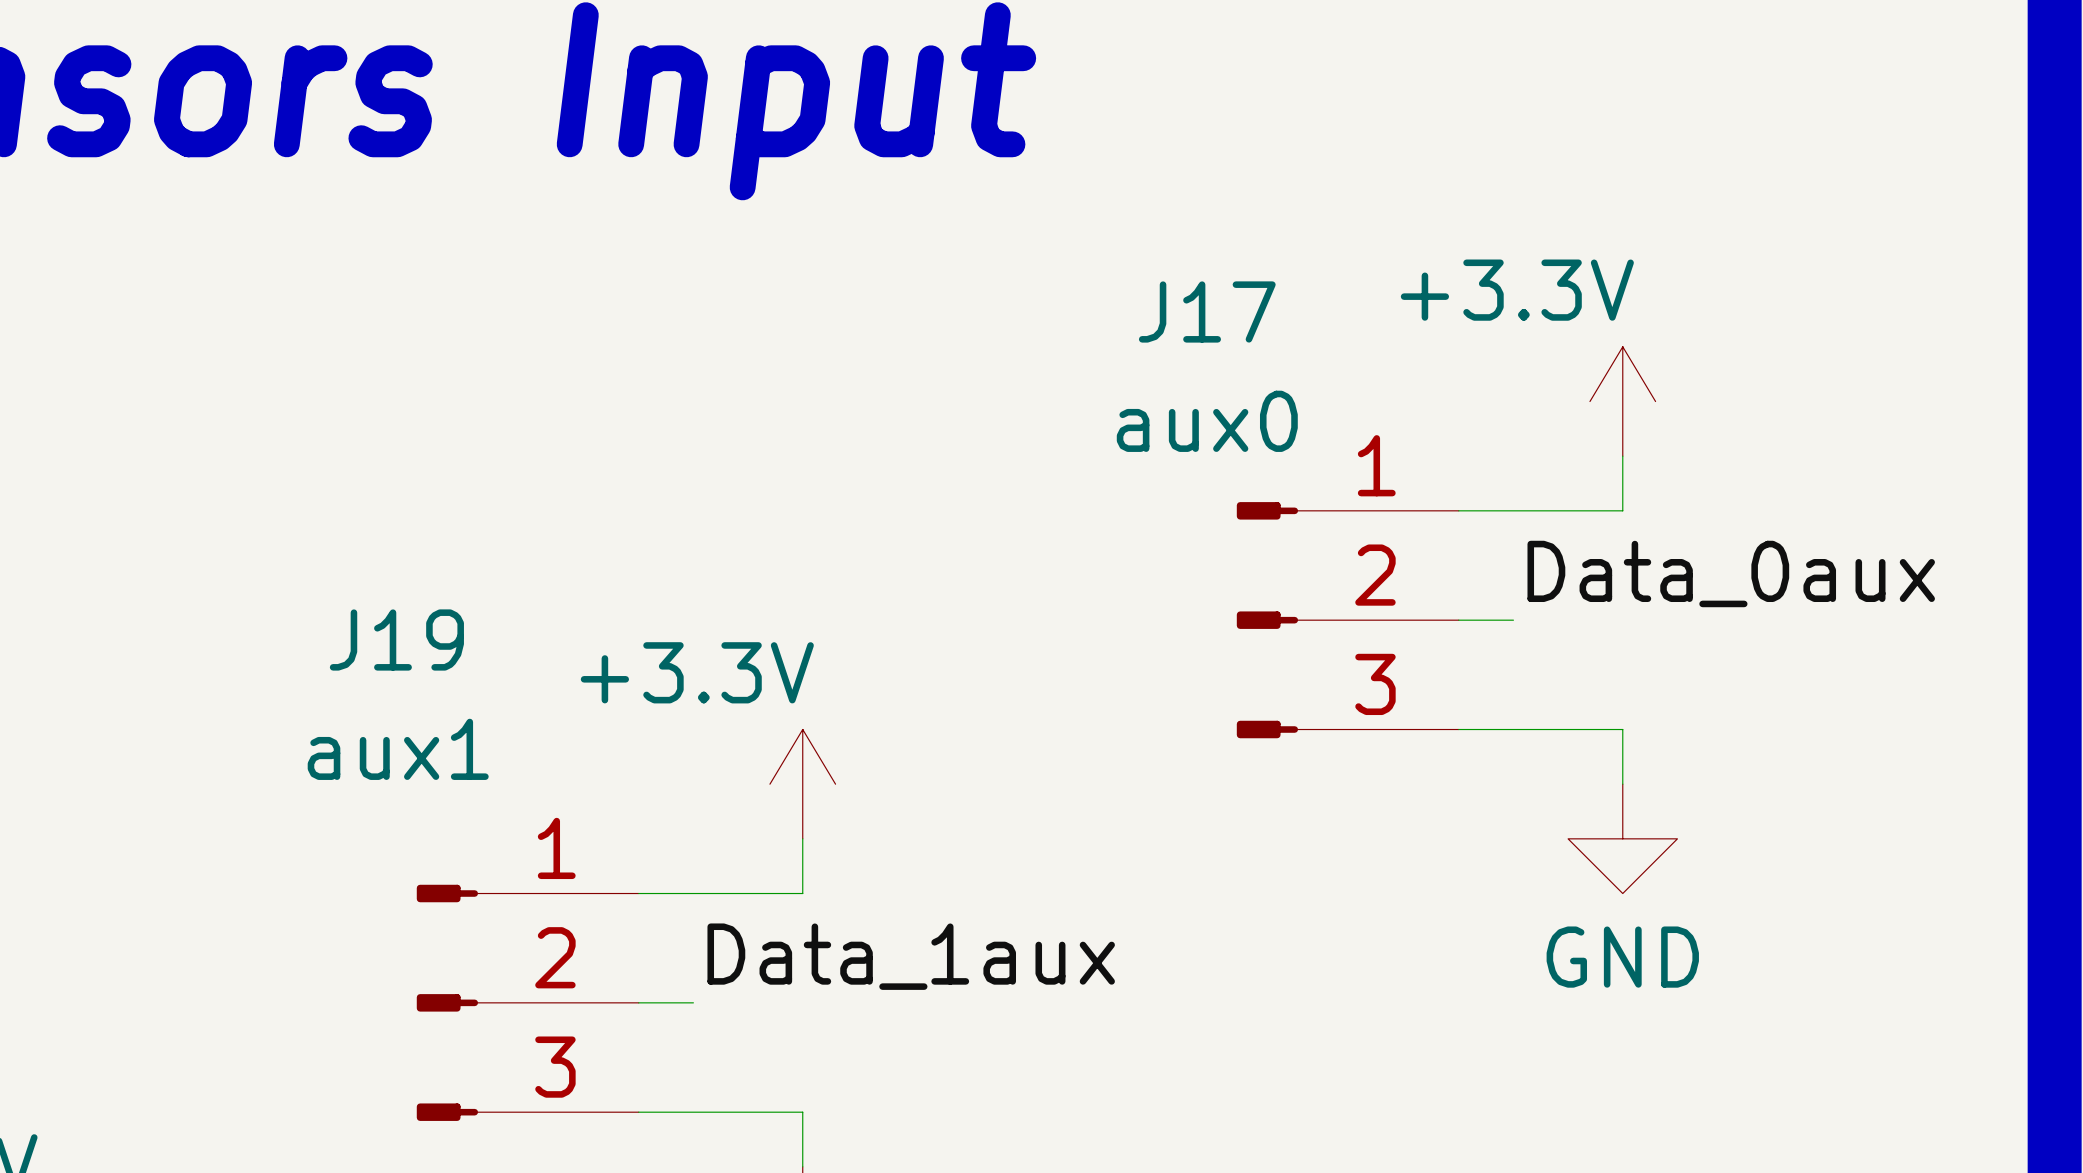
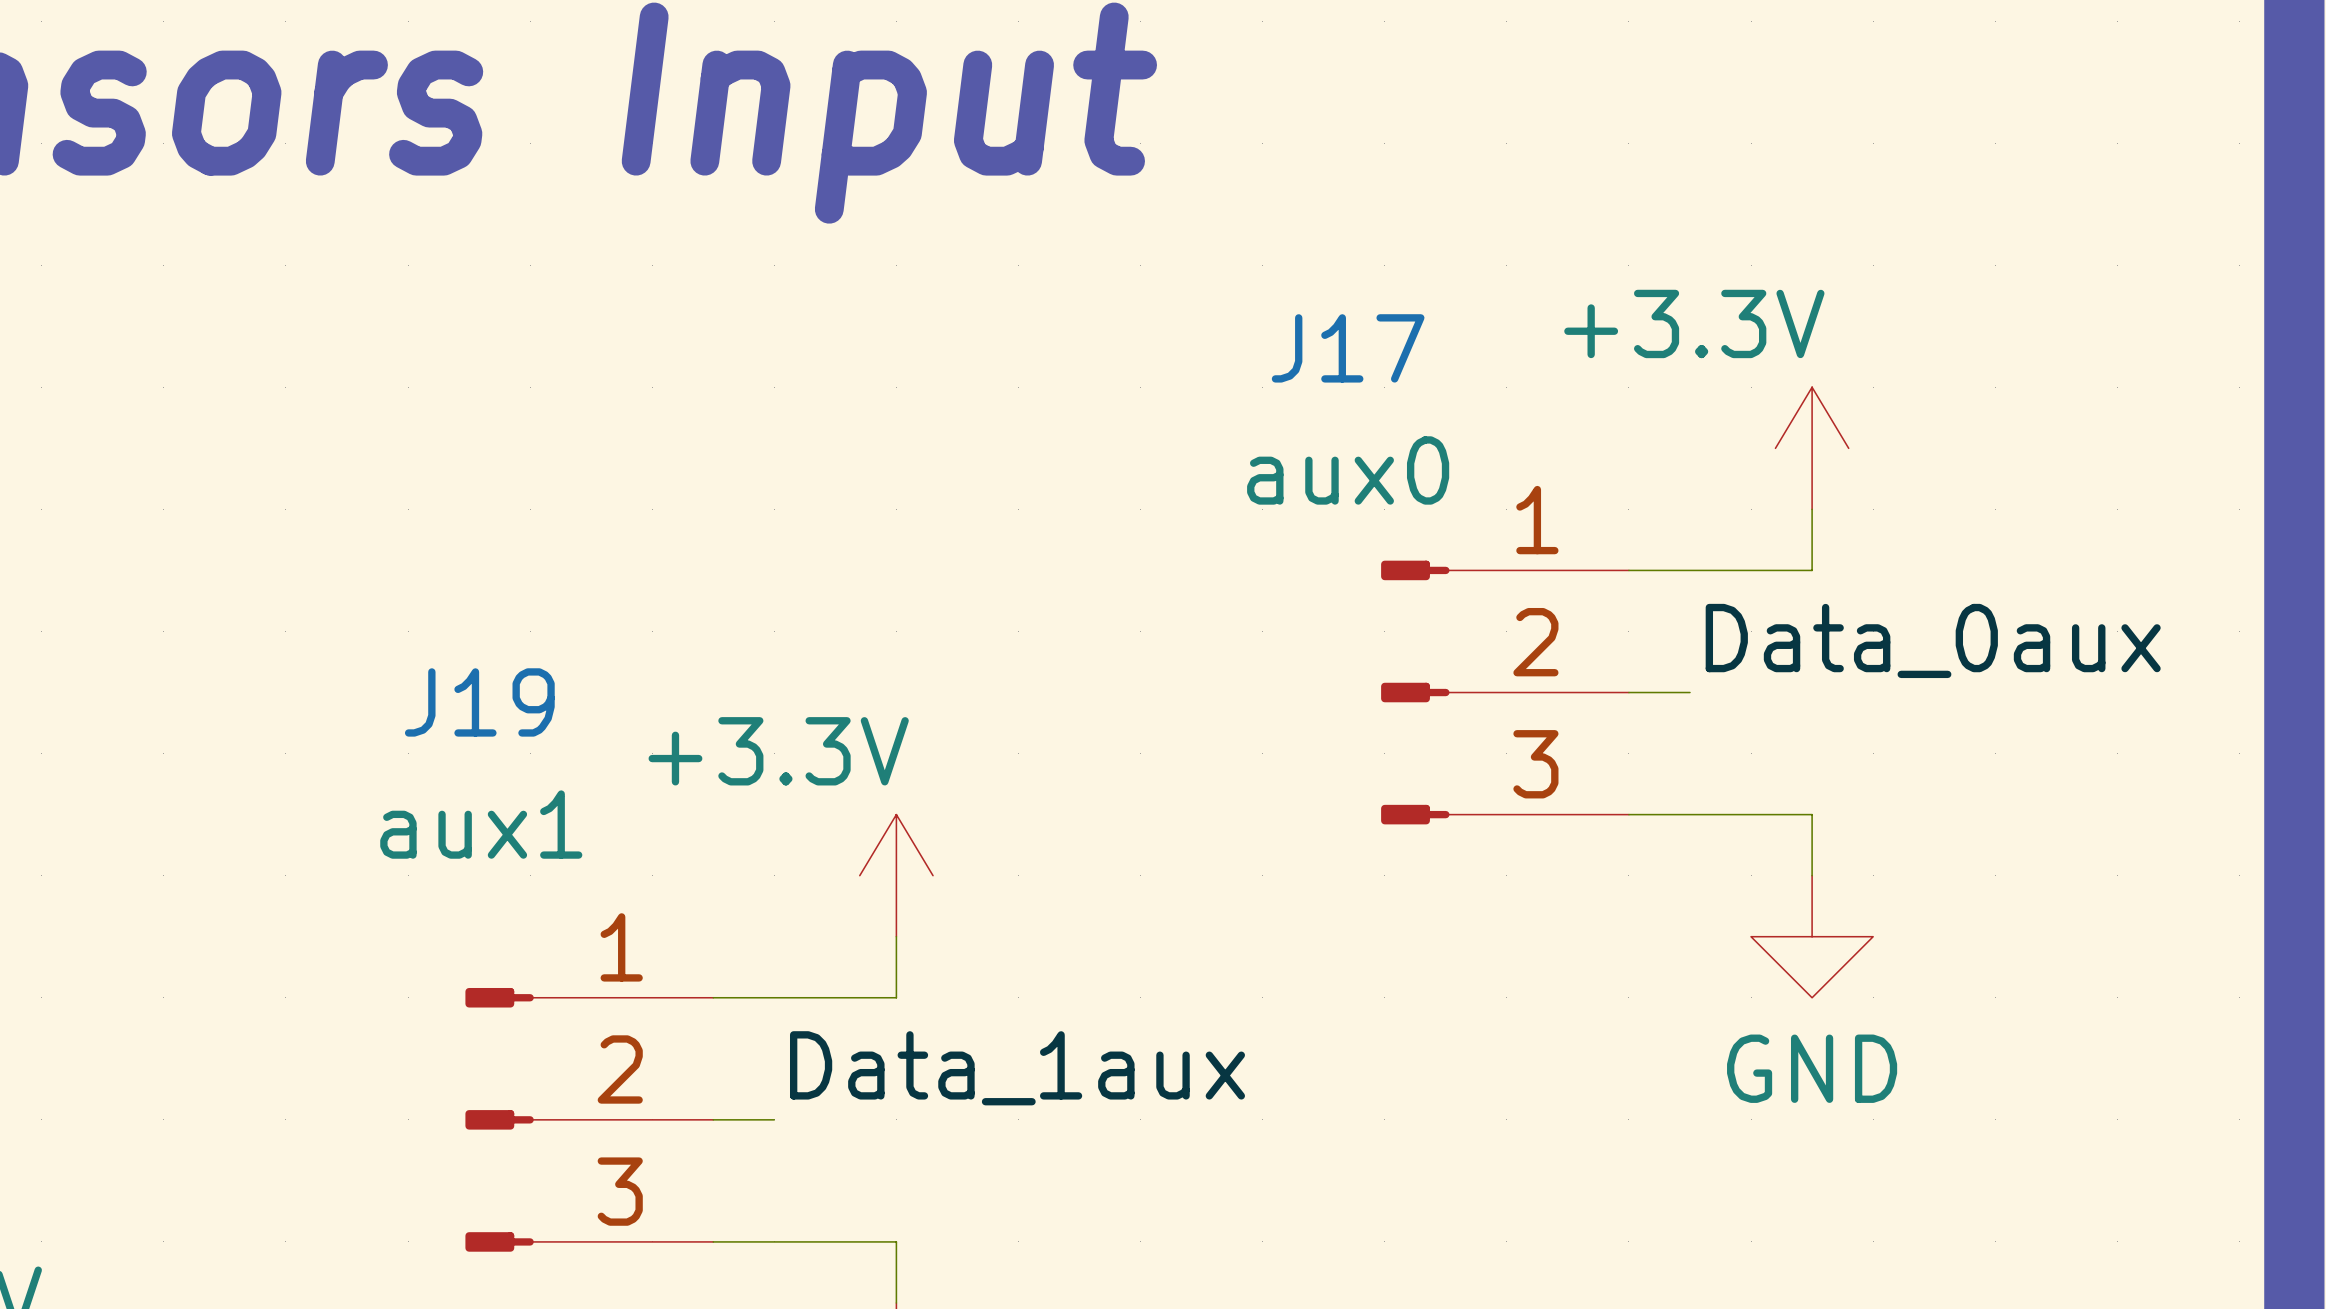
J19 name position: J19 (396, 640) -> J19 (479, 702)
J19 value position: aux1 (398, 749) -> aux1 (481, 824)

